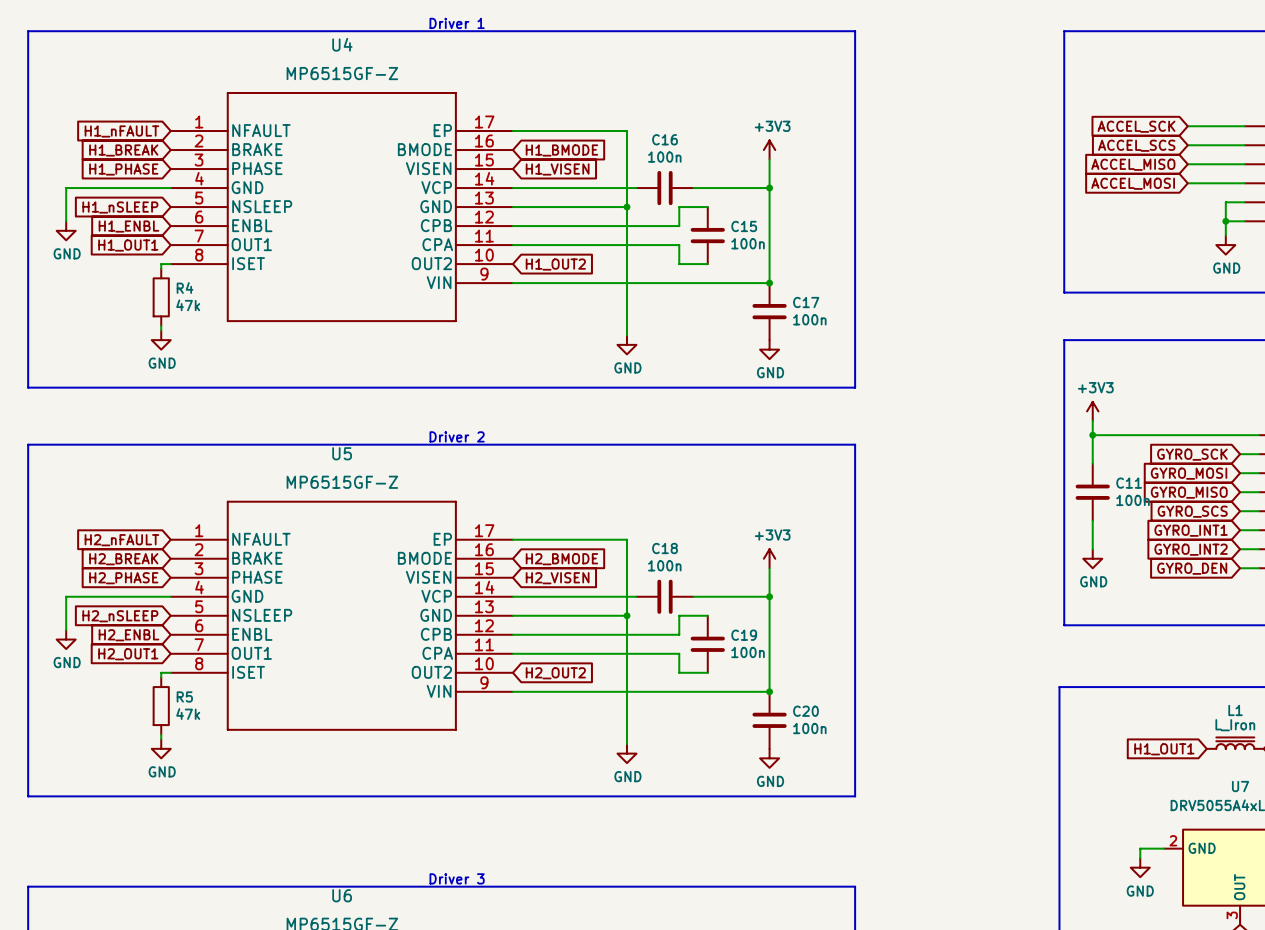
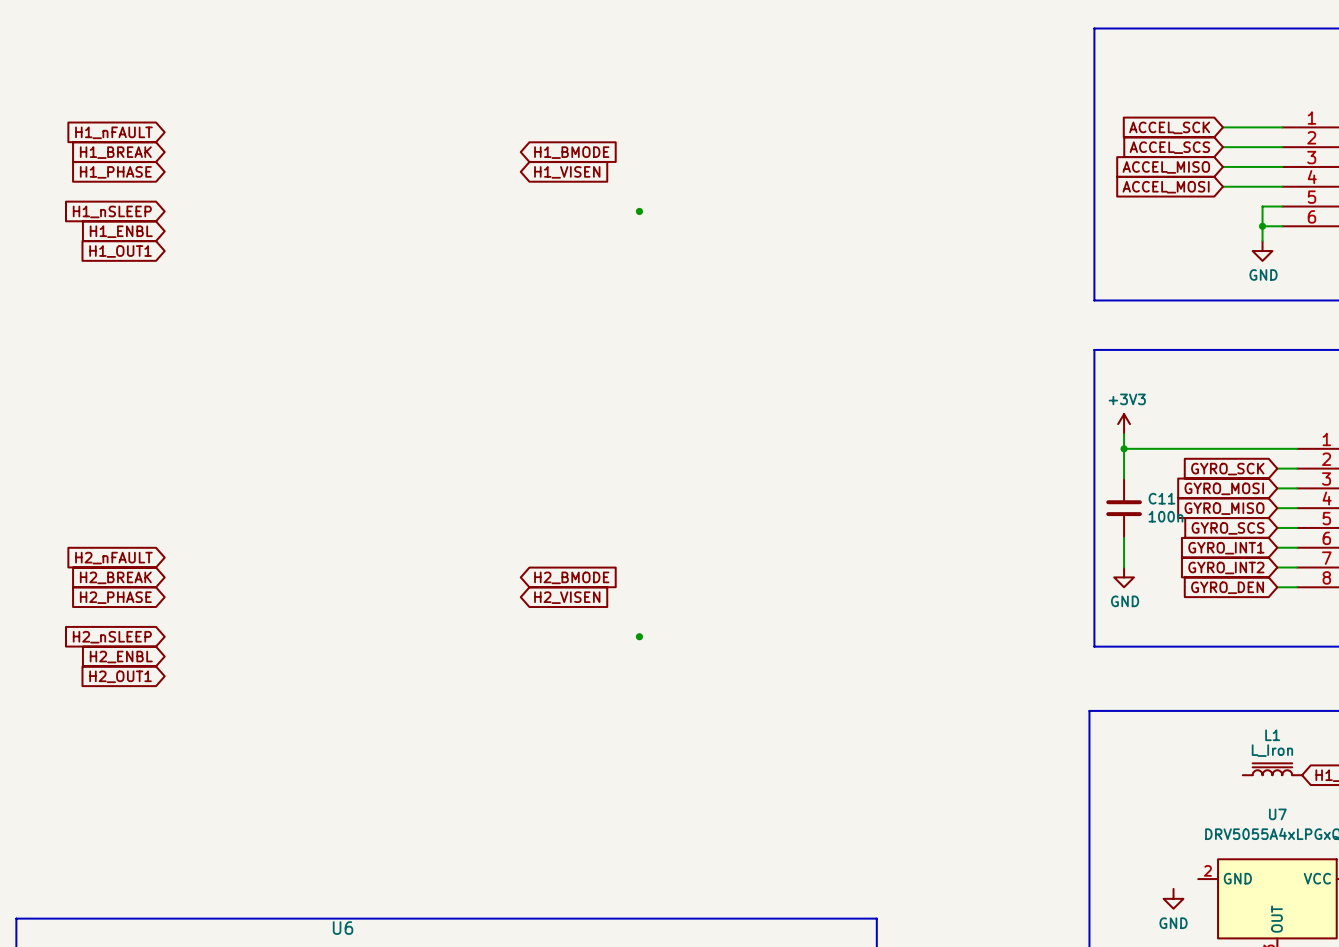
text: Driver 1 (457, 23) -> none
line: (28, 31) (28, 387) (855, 387) (855, 31) (28, 31) -> none
wire: (512, 131) (626, 131) (626, 335) -> none
power symbol: +3V3 (769, 150) -> none
wire: (769, 159) (769, 283) (512, 283) -> none
wire: (170, 188) (66, 188) (66, 221) -> none
wire: (512, 188) (636, 188) -> none
C16: 100n (665, 188) -> none
wire: (693, 188) (769, 188) -> none
junction: (769, 188) -> none
U4: MP6515GF-Z (341, 207) -> none
wire: (512, 207) (626, 207) -> none
wire: (707, 207) (679, 207) (679, 226) (512, 226) -> none
power symbol: GND (66, 230) -> none
C15: 100n (707, 235) -> none
wire: (512, 245) (679, 245) (679, 264) (707, 264) -> none
wire: (170, 264) (161, 264) (161, 268) -> none
global label: H1_OUT2 (555, 264) -> none
junction: (769, 283) -> none
R4: 47k (161, 297) -> none
C17: 100n (769, 311) -> none
wire: (161, 325) (161, 330) -> none
power symbol: GND (161, 340) -> none
power symbol: GND (626, 344) -> none
power symbol: GND (769, 349) -> none
text: Driver 2 (457, 436) -> none
line: (28, 444) (28, 796) (855, 796) (855, 444) (28, 444) -> none
wire: (512, 539) (626, 539) (626, 744) -> none
power symbol: +3V3 (769, 558) -> none
wire: (769, 568) (769, 691) (512, 691) -> none
wire: (170, 596) (66, 596) (66, 630) -> none
wire: (512, 596) (636, 596) -> none
C18: 100n (665, 596) -> none
wire: (693, 596) (769, 596) -> none
junction: (769, 596) -> none
U5: MP6515GF-Z (341, 615) -> none
wire: (512, 615) (626, 615) -> none
wire: (707, 615) (679, 615) (679, 634) (512, 634) -> none
power symbol: GND (66, 639) -> none
C19: 100n (707, 644) -> none
wire: (512, 653) (679, 653) (679, 672) (707, 672) -> none
wire: (170, 672) (161, 672) (161, 677) -> none
global label: H2_OUT2 (555, 673) -> none
junction: (769, 691) -> none
R5: 47k (161, 706) -> none
C20: 100n (769, 720) -> none
wire: (161, 734) (161, 739) -> none
power symbol: GND (161, 748) -> none
global label: H1_OUT1 (1164, 749) -> none
power symbol: GND (626, 753) -> none
power symbol: GND (769, 758) -> none
wire: (1164, 848) (1140, 848) (1140, 858) -> none
text: Driver 3 (457, 878) -> none

